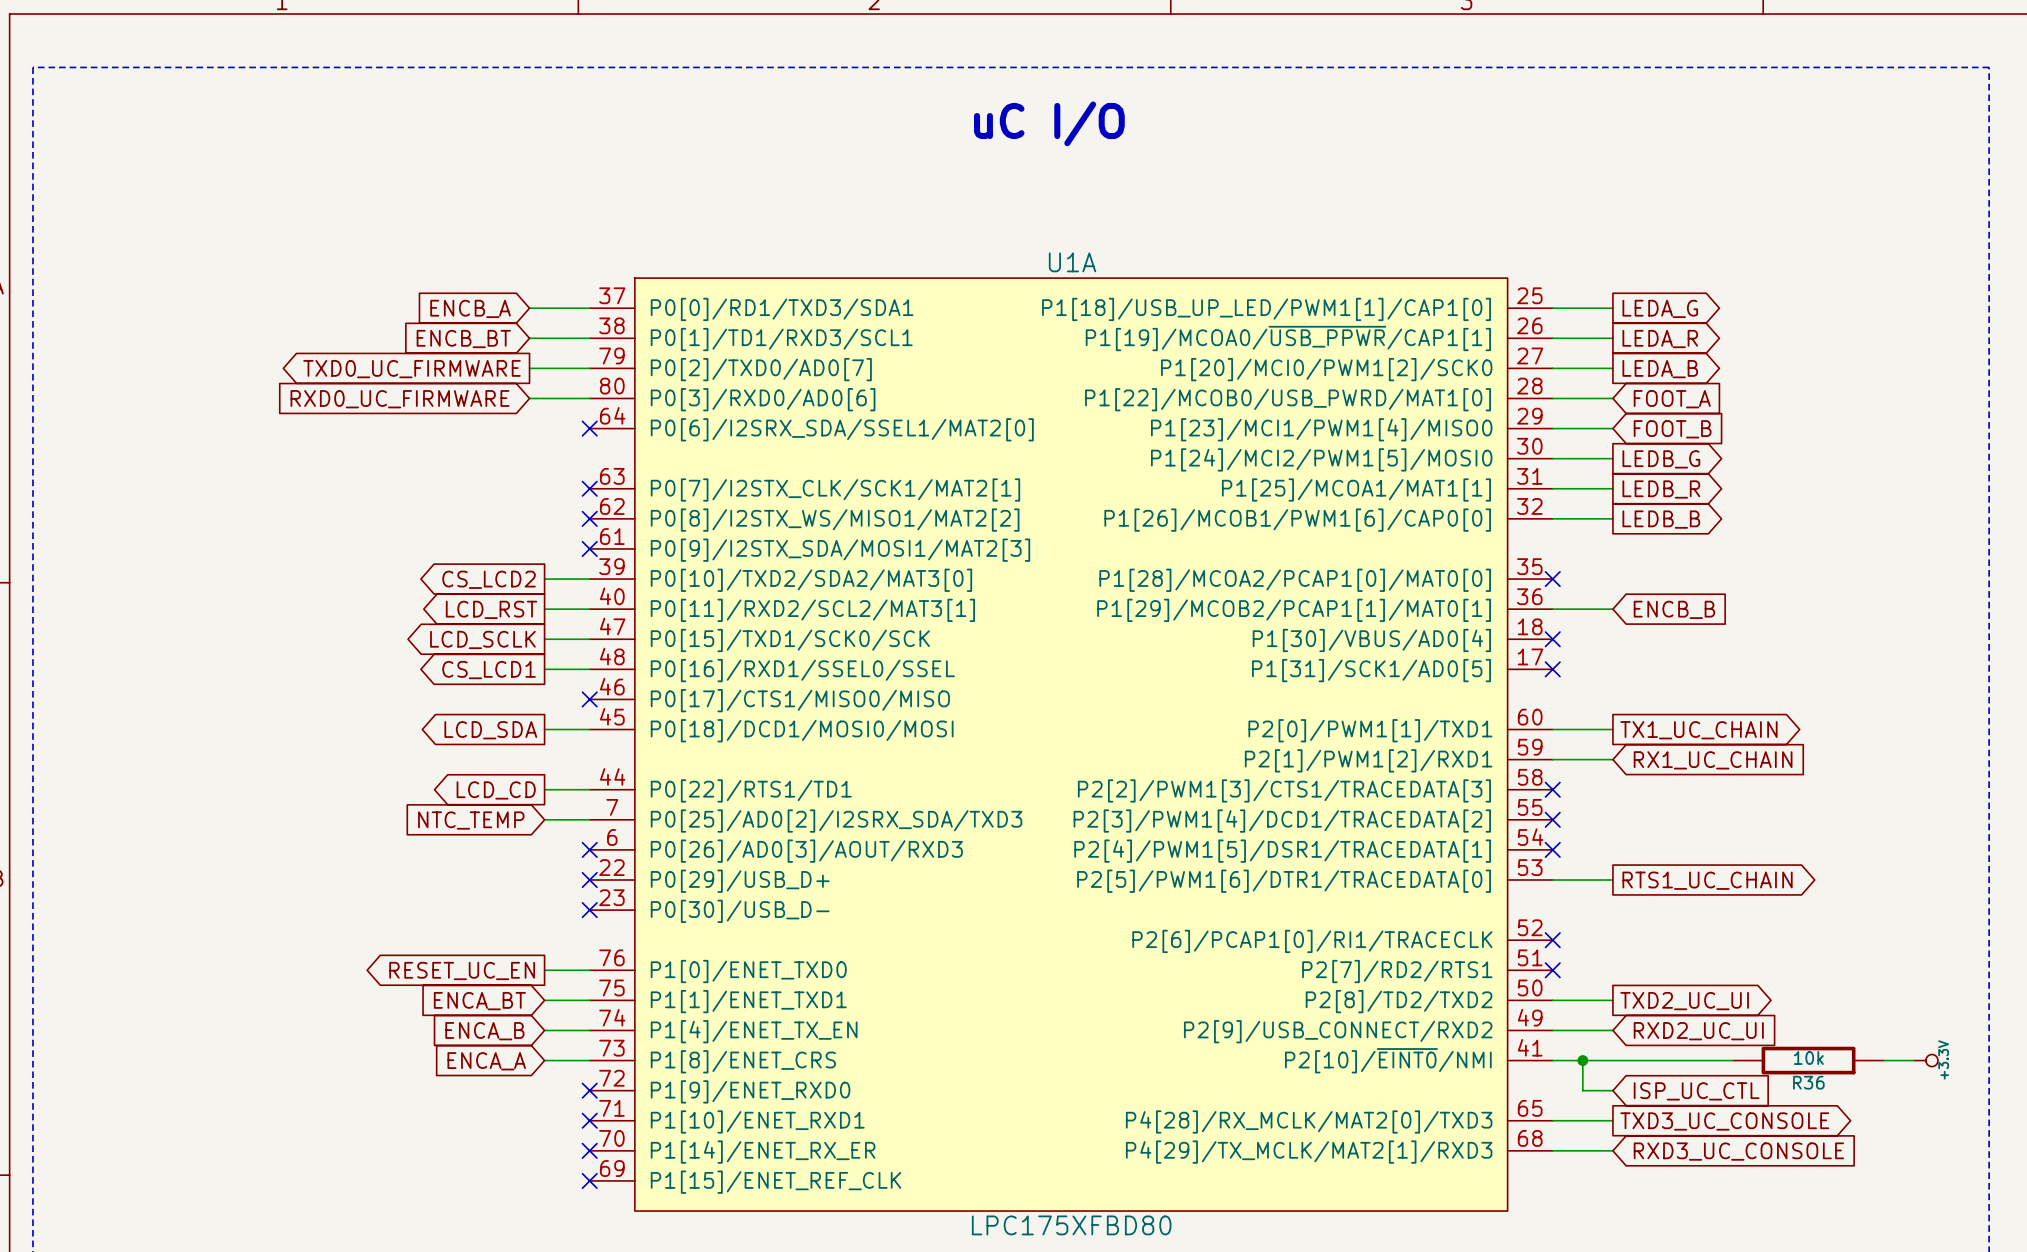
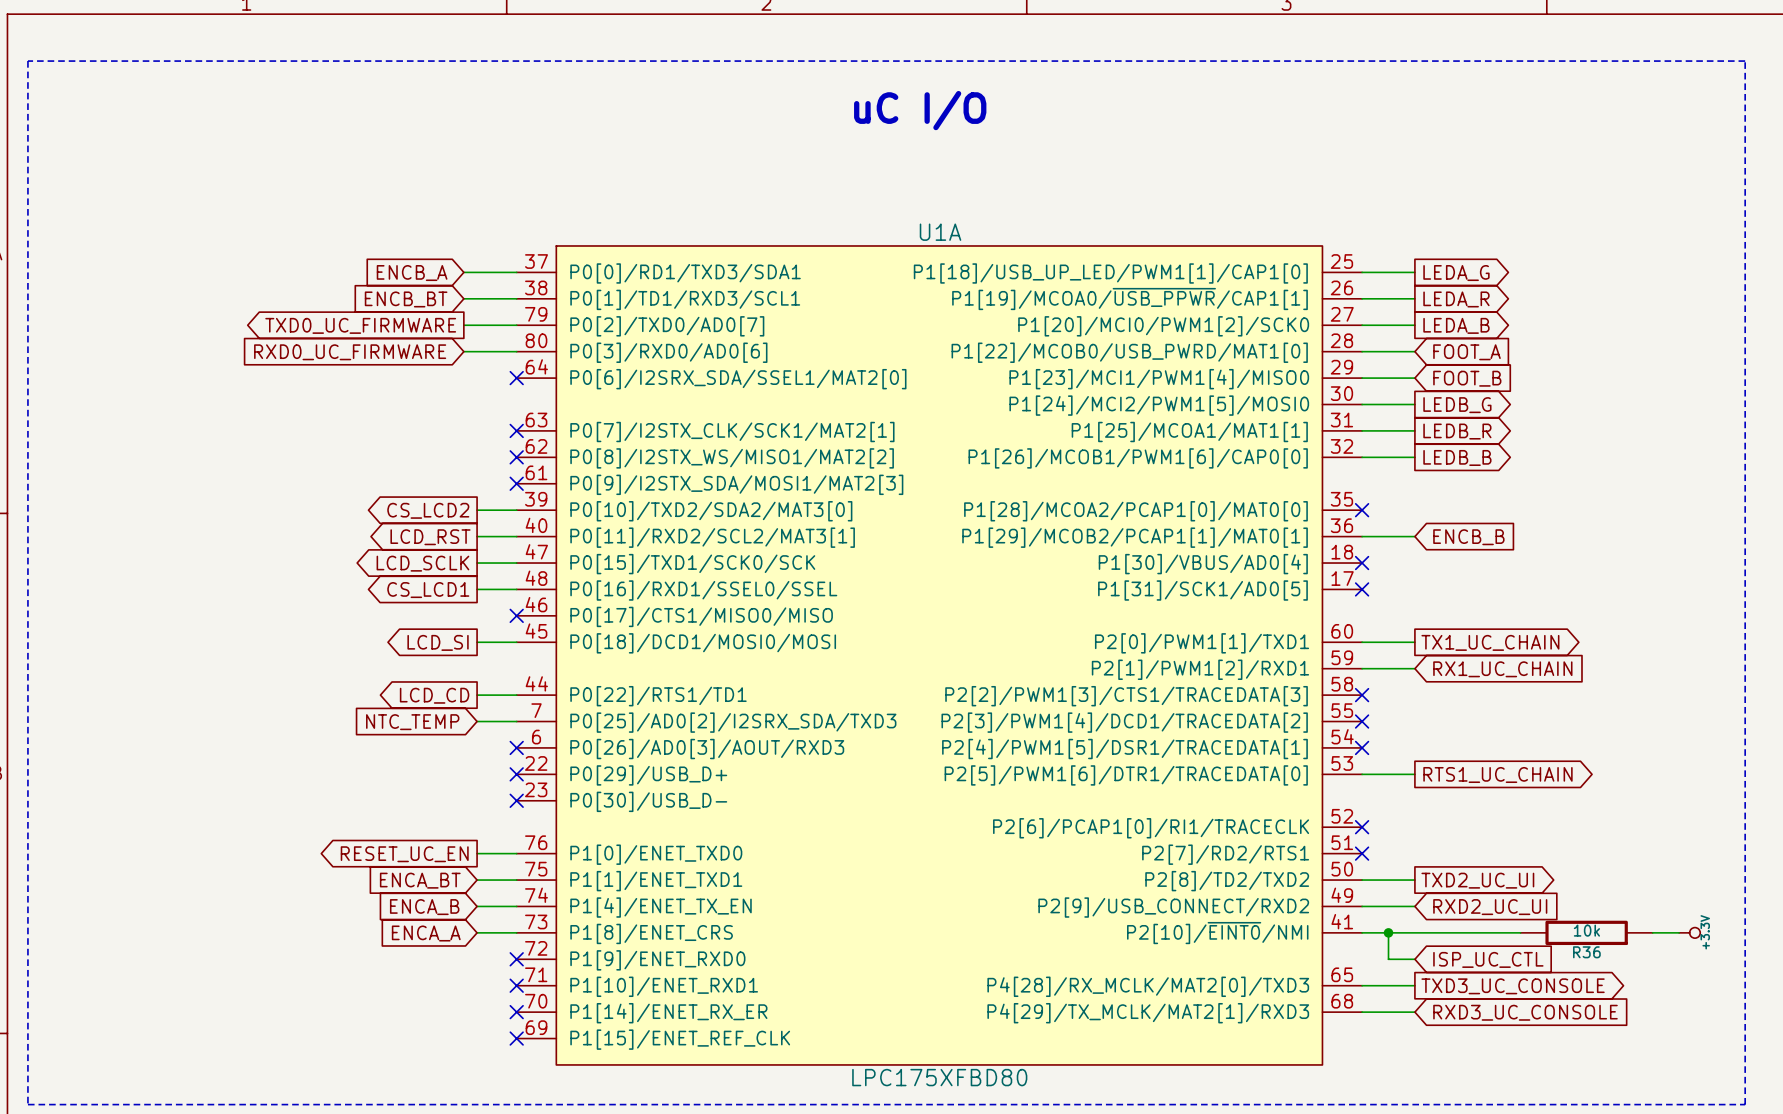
global label: LCD_SDA (490, 730) -> LCD_SI (438, 642)

